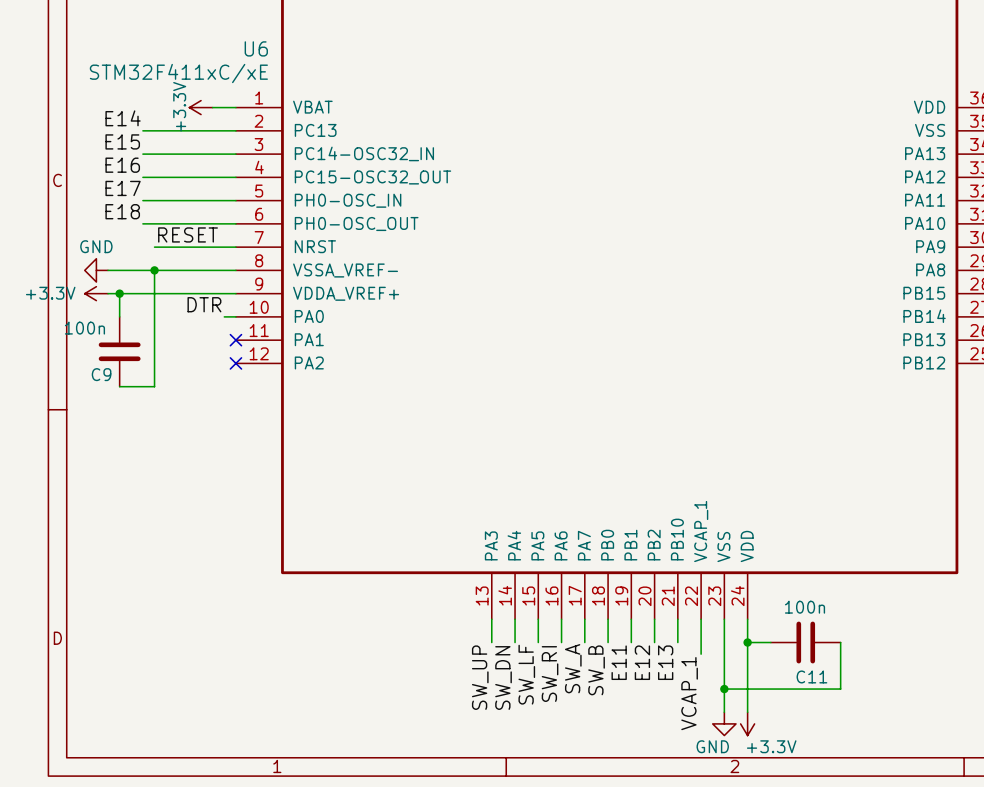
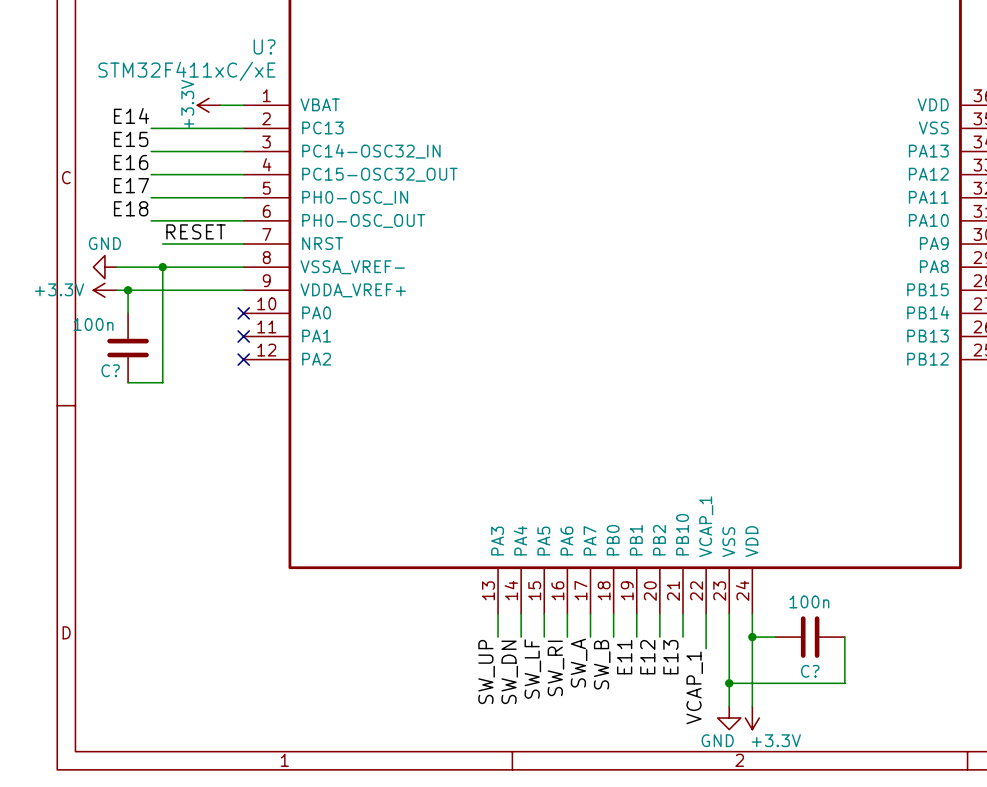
U6 name: U6 (256, 48) -> U? (264, 46)
label: DTR (204, 304) -> none
wire: (224, 316) (235, 316) -> none
no-connect mark: none -> (243, 313)
C9 name: C9 (101, 374) -> C? (110, 370)
C11 name: C11 (811, 676) -> C? (810, 671)

